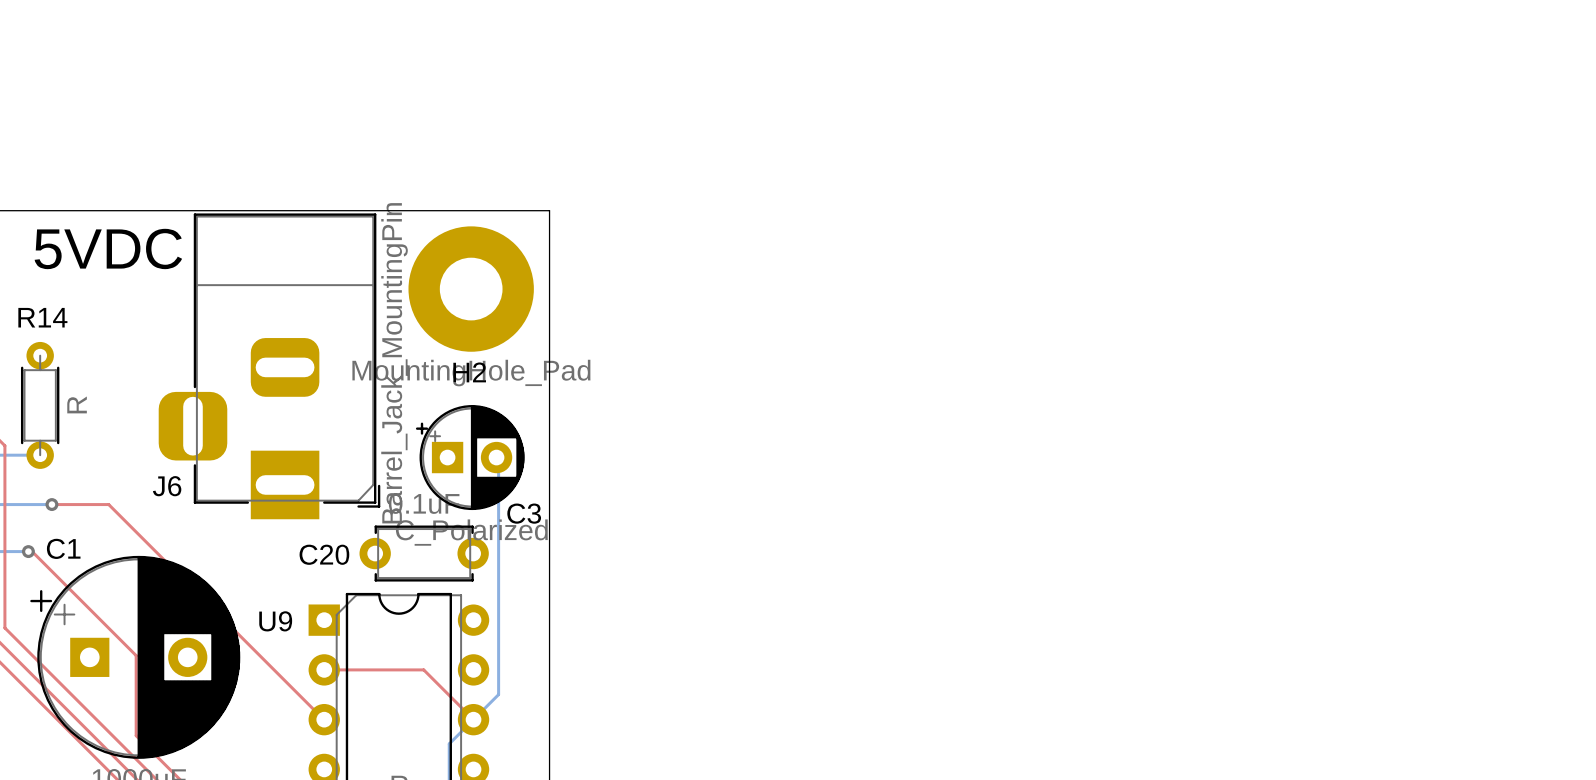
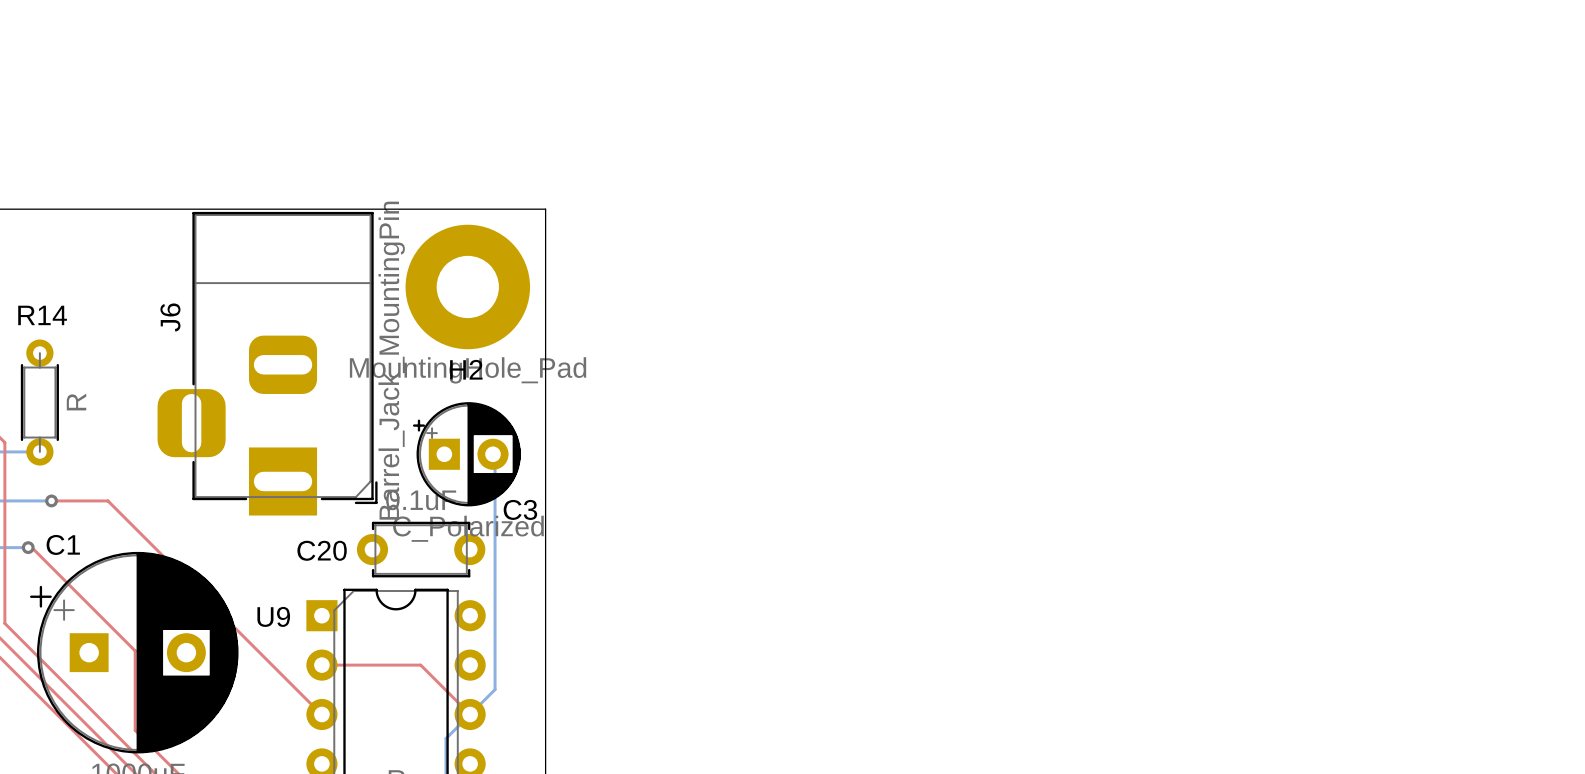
text: 5VDC (108, 248) -> none
J6 name rotation: 0° (167, 486) -> 90° counterclockwise (170, 317)
J6 name position: J6 (167, 486) -> J6 (170, 317)

